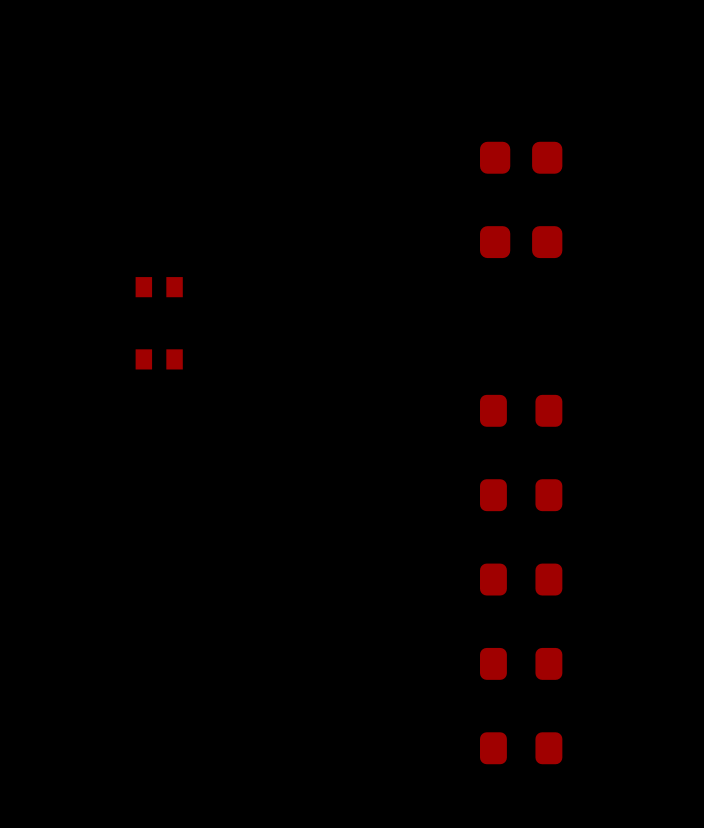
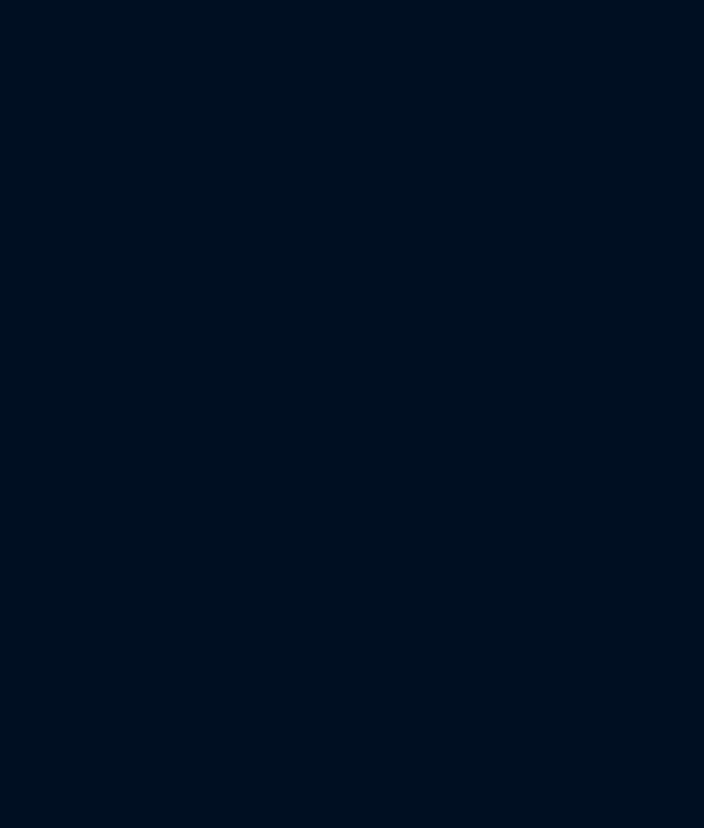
part: (521, 157) -> none
part: (521, 242) -> none
part: (159, 287) -> none
part: (159, 359) -> none
part: (521, 410) -> none
part: (521, 495) -> none
part: (521, 579) -> none
part: (521, 663) -> none
part: (521, 748) -> none

